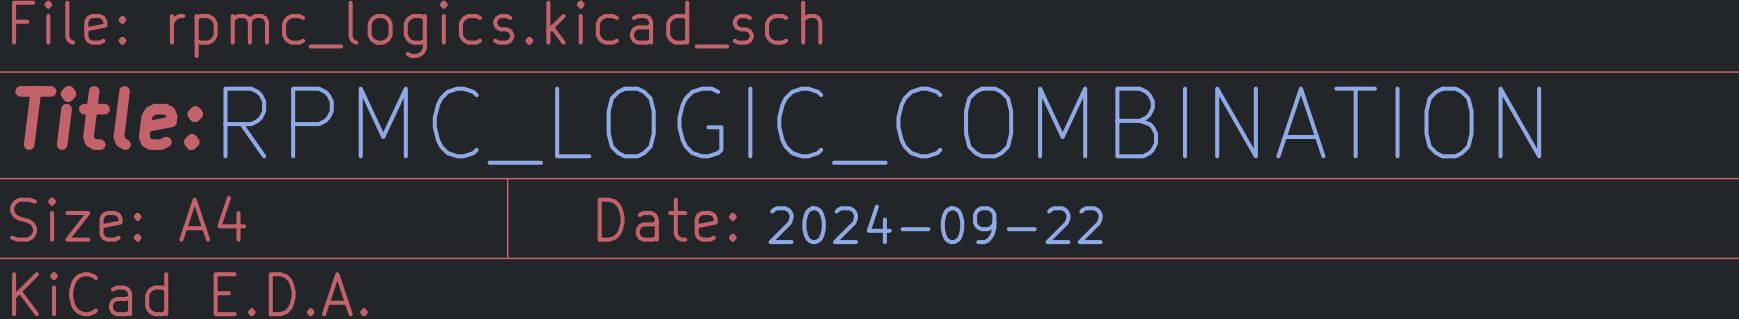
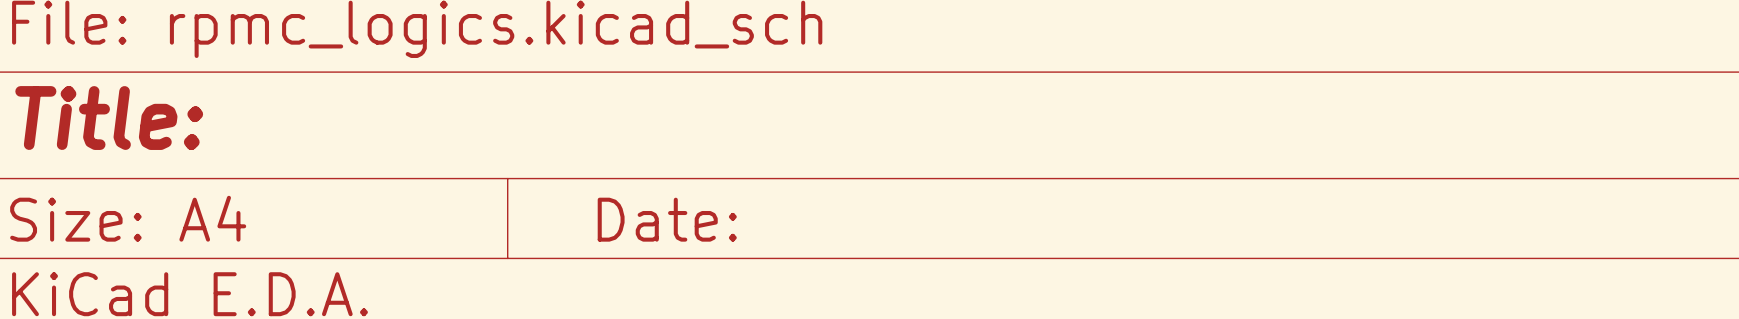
text: RPMC_LOGIC_COMBINATION (882, 125) -> none
text: 2024-09-22 (935, 224) -> none

